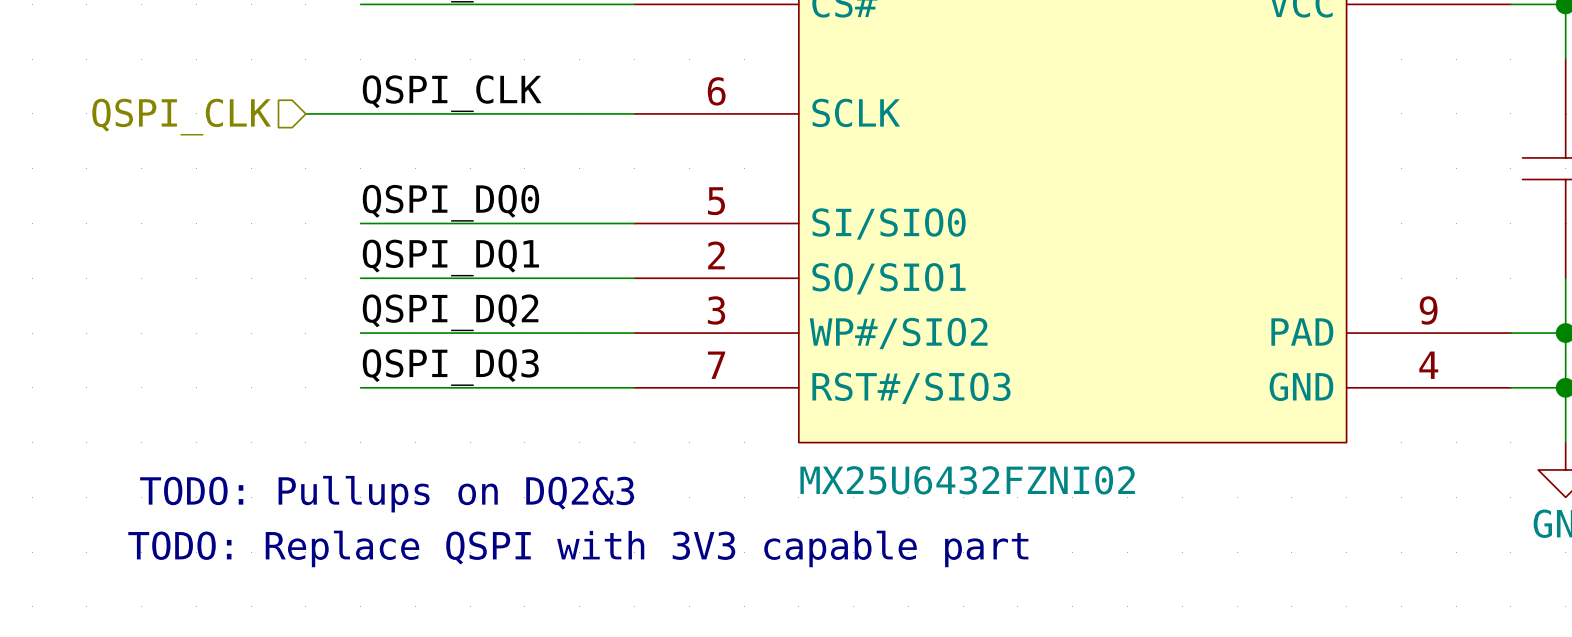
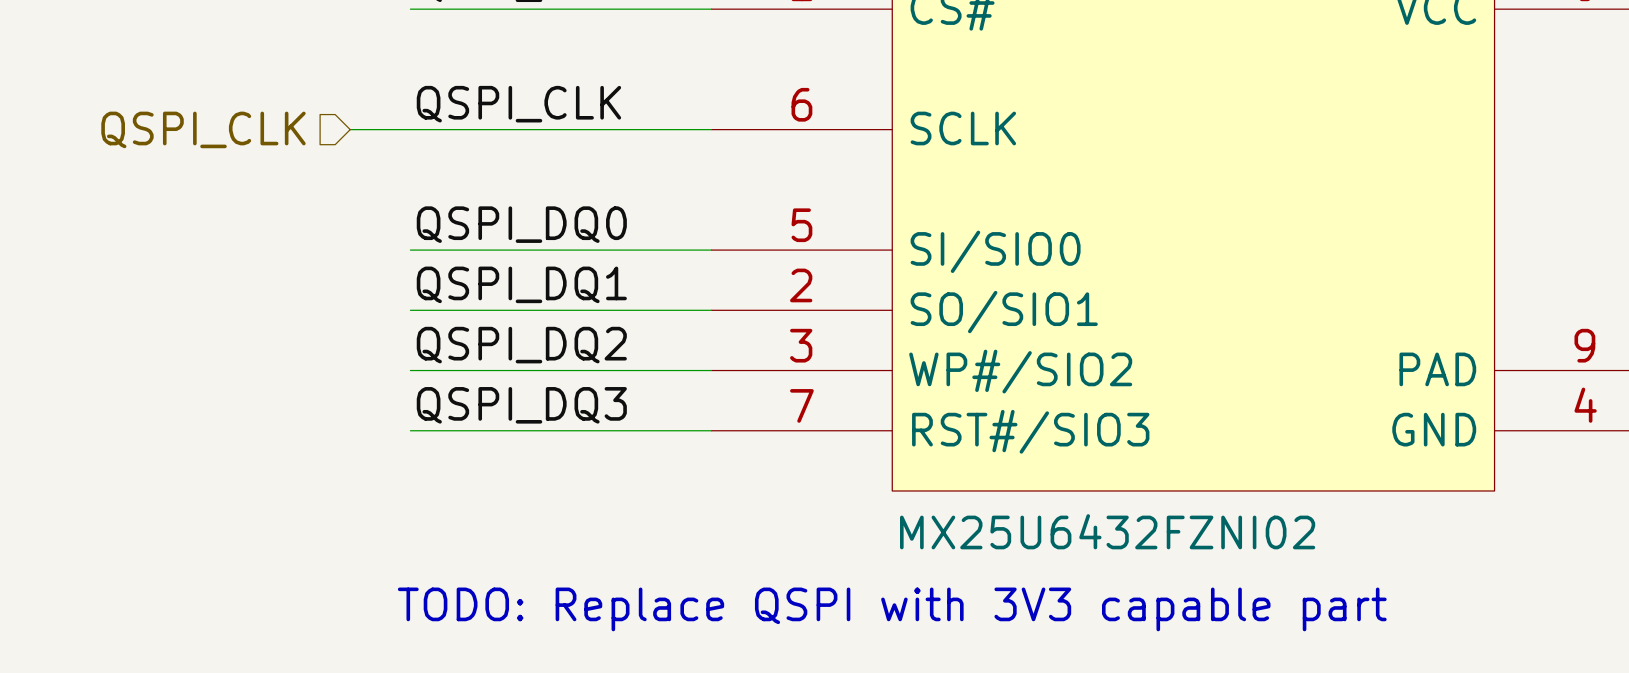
text: TODO: Pullups on DQ2&3 (387, 494) -> none
text position: TODO: Replace QSPI with 3V3 capable part (578, 548) -> TODO: Replace QSPI with 3V3 capable part (892, 609)

